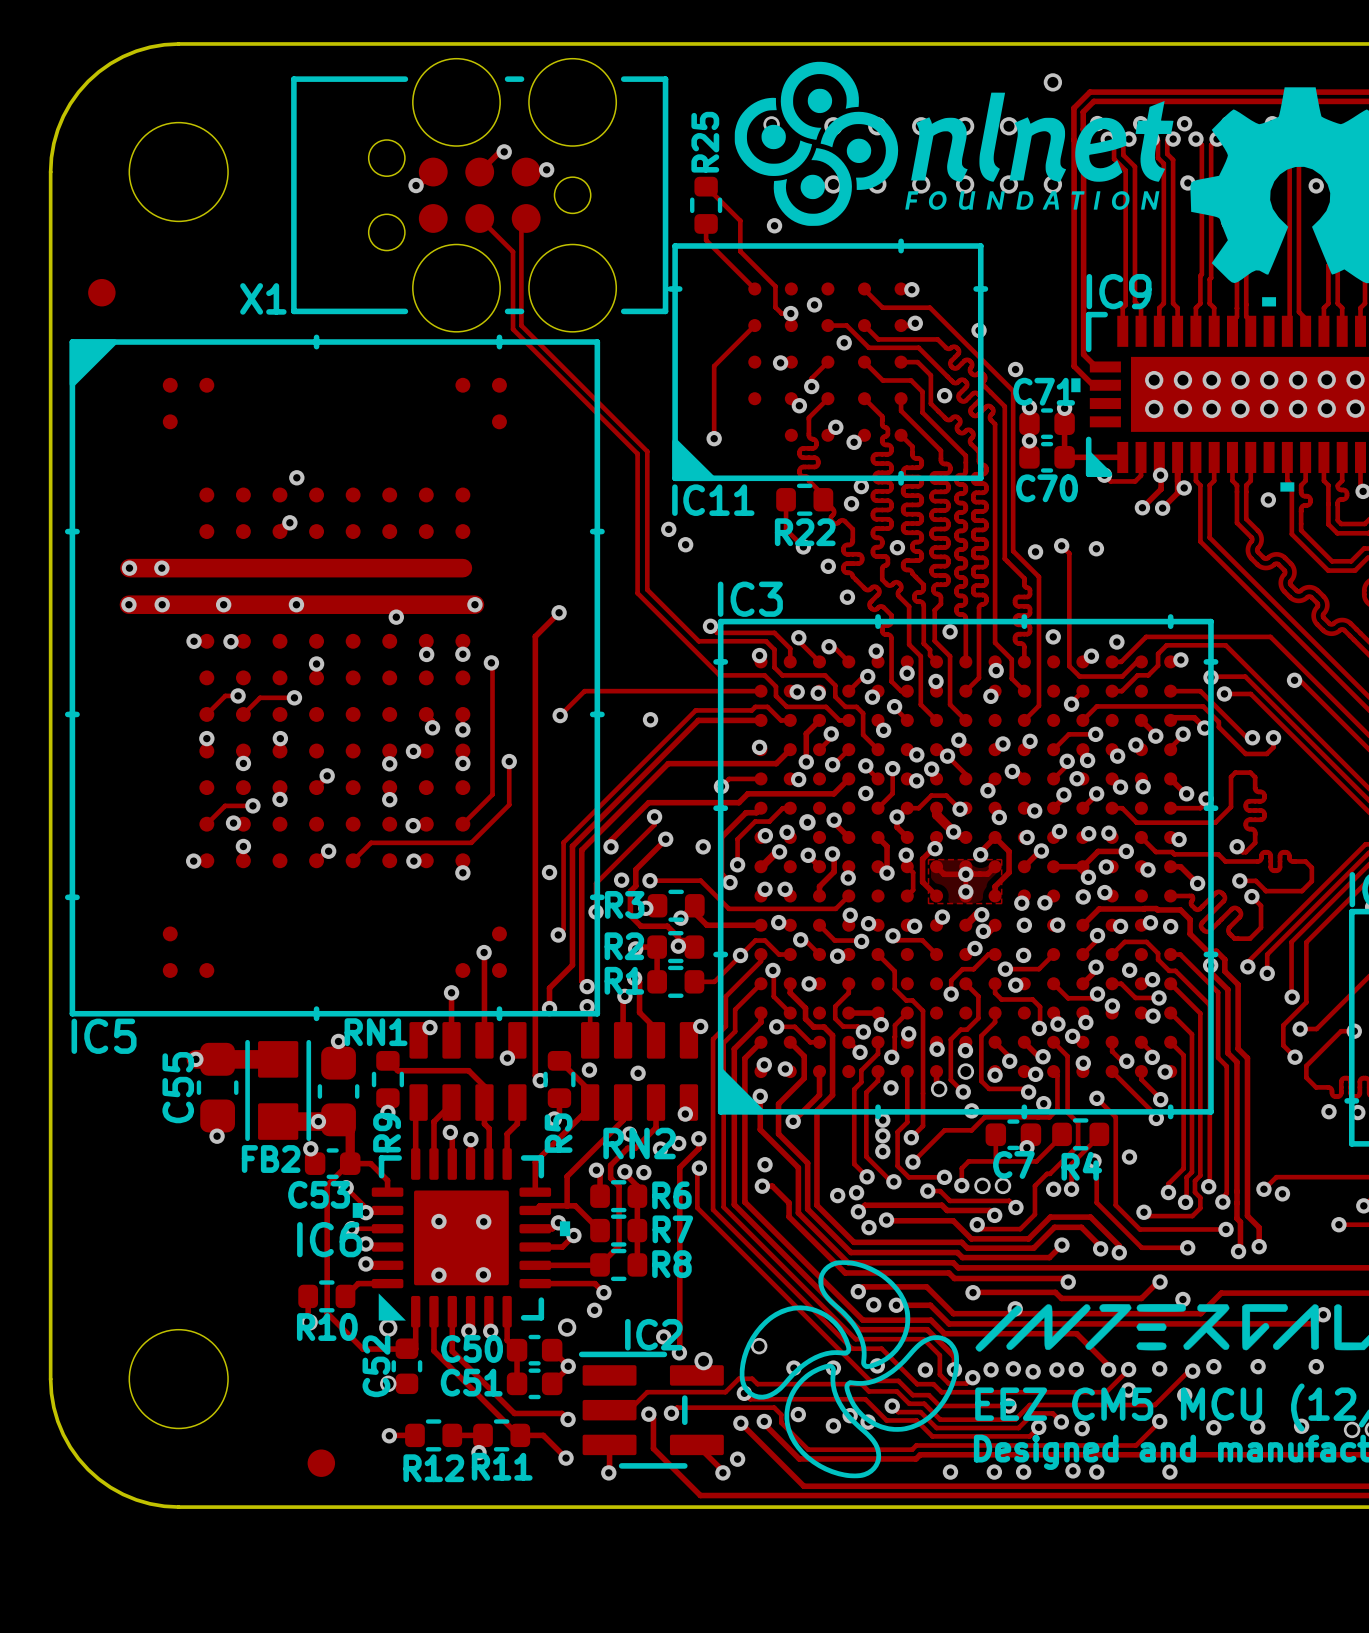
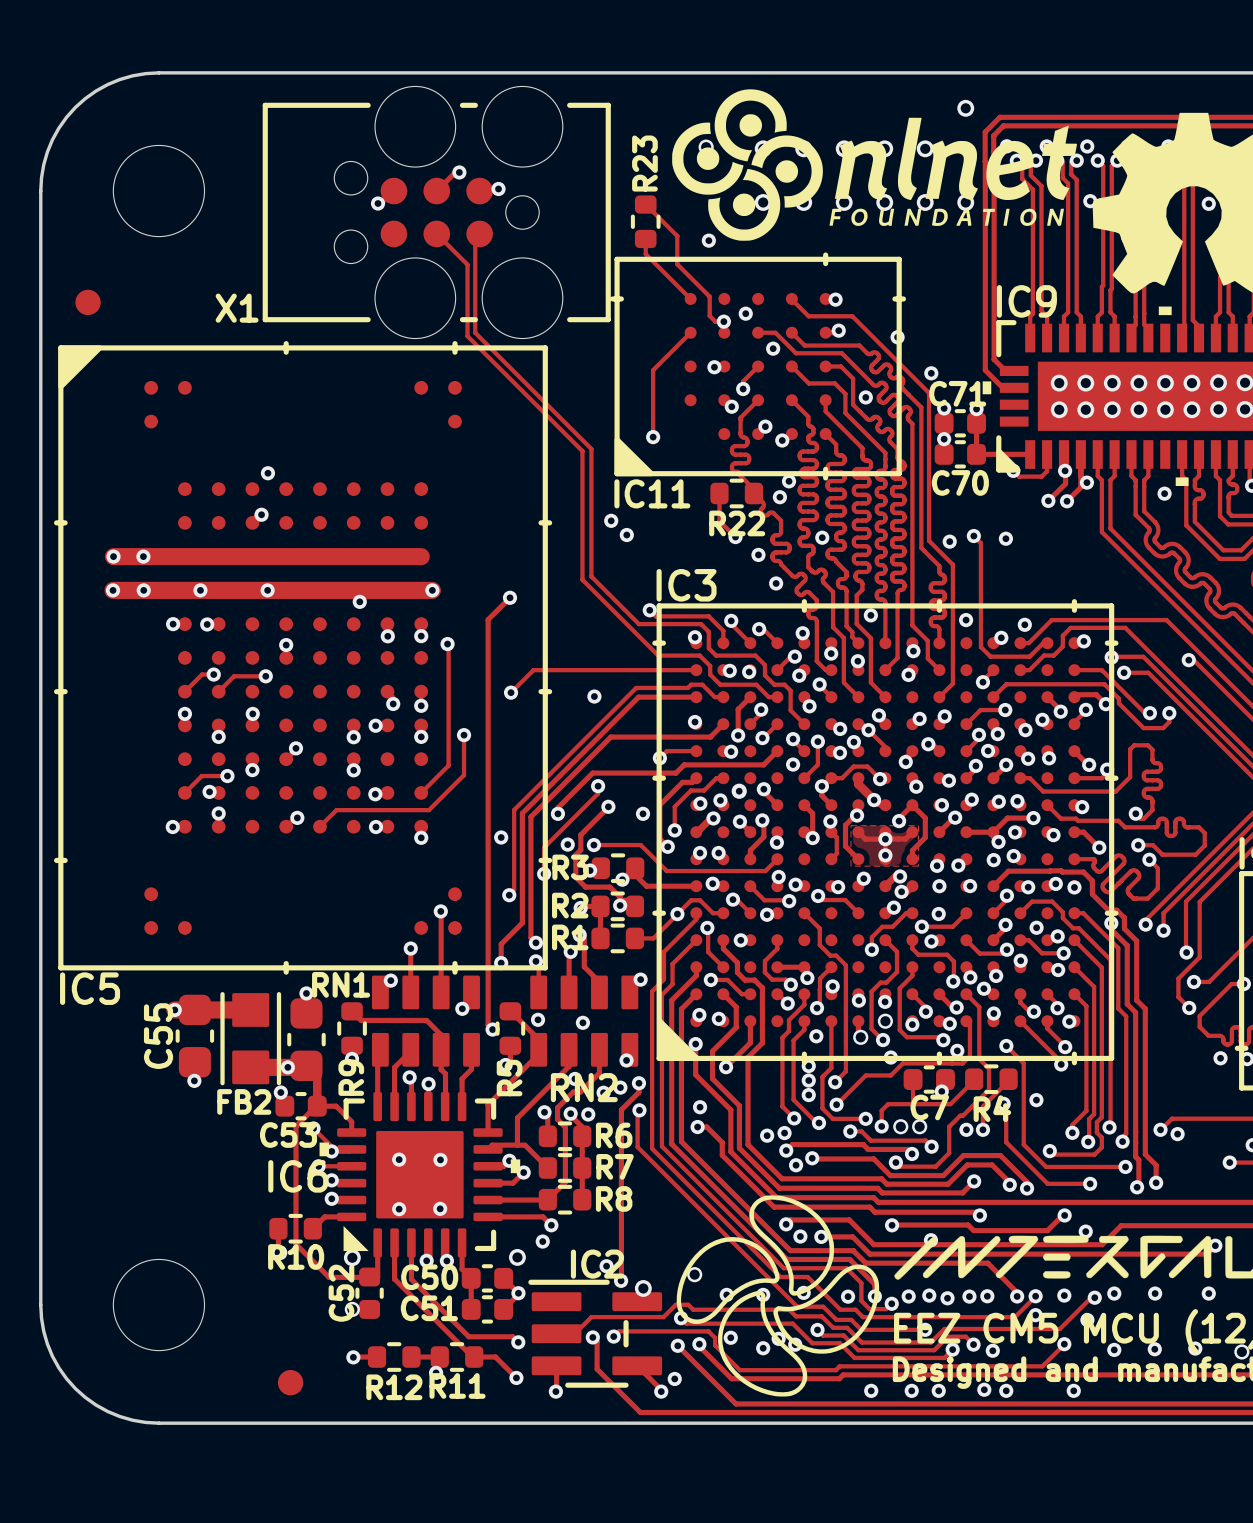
R25 name: R25 (705, 142) -> R23 (644, 163)

